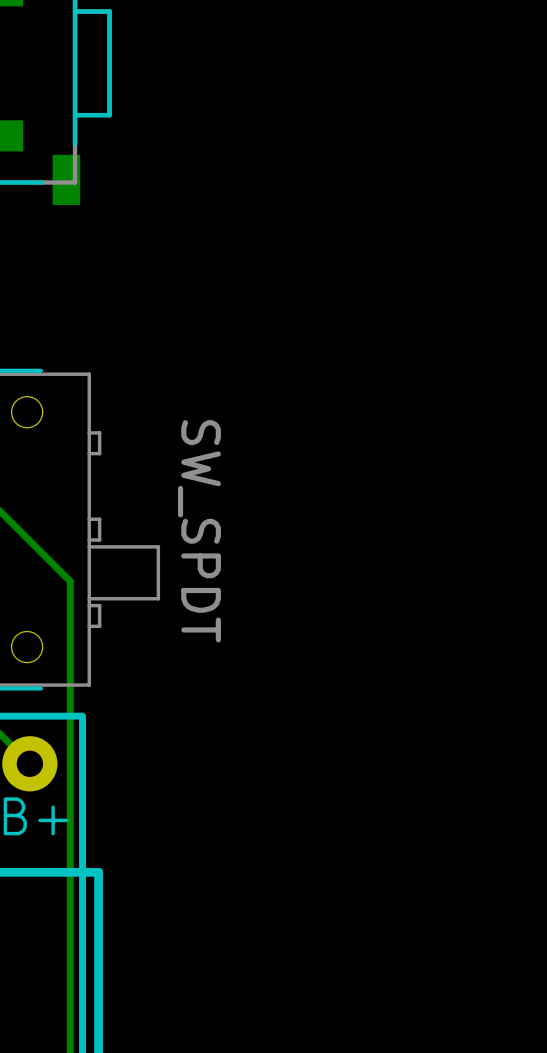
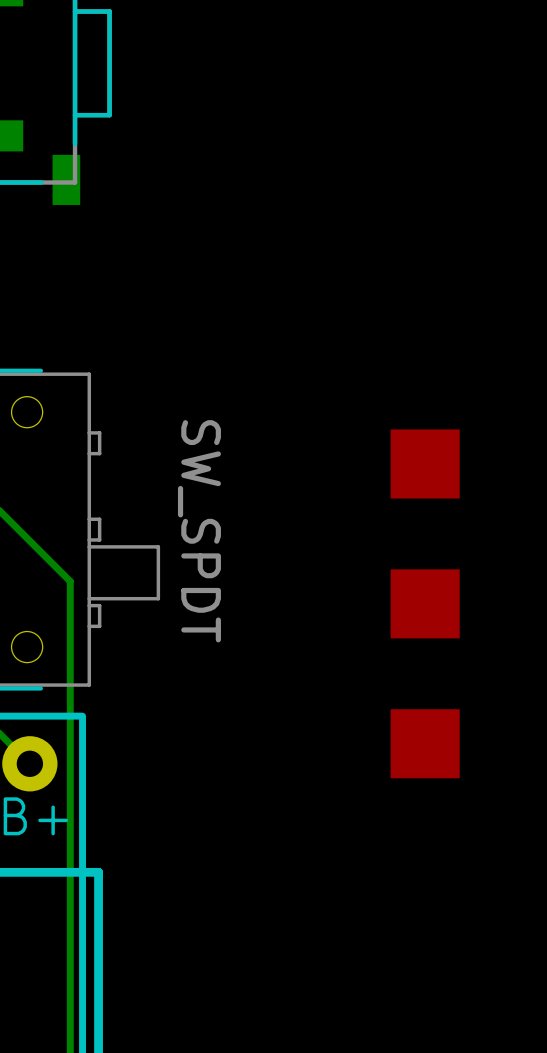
part: none -> (425, 464)
part: none -> (425, 603)
part: none -> (425, 743)

